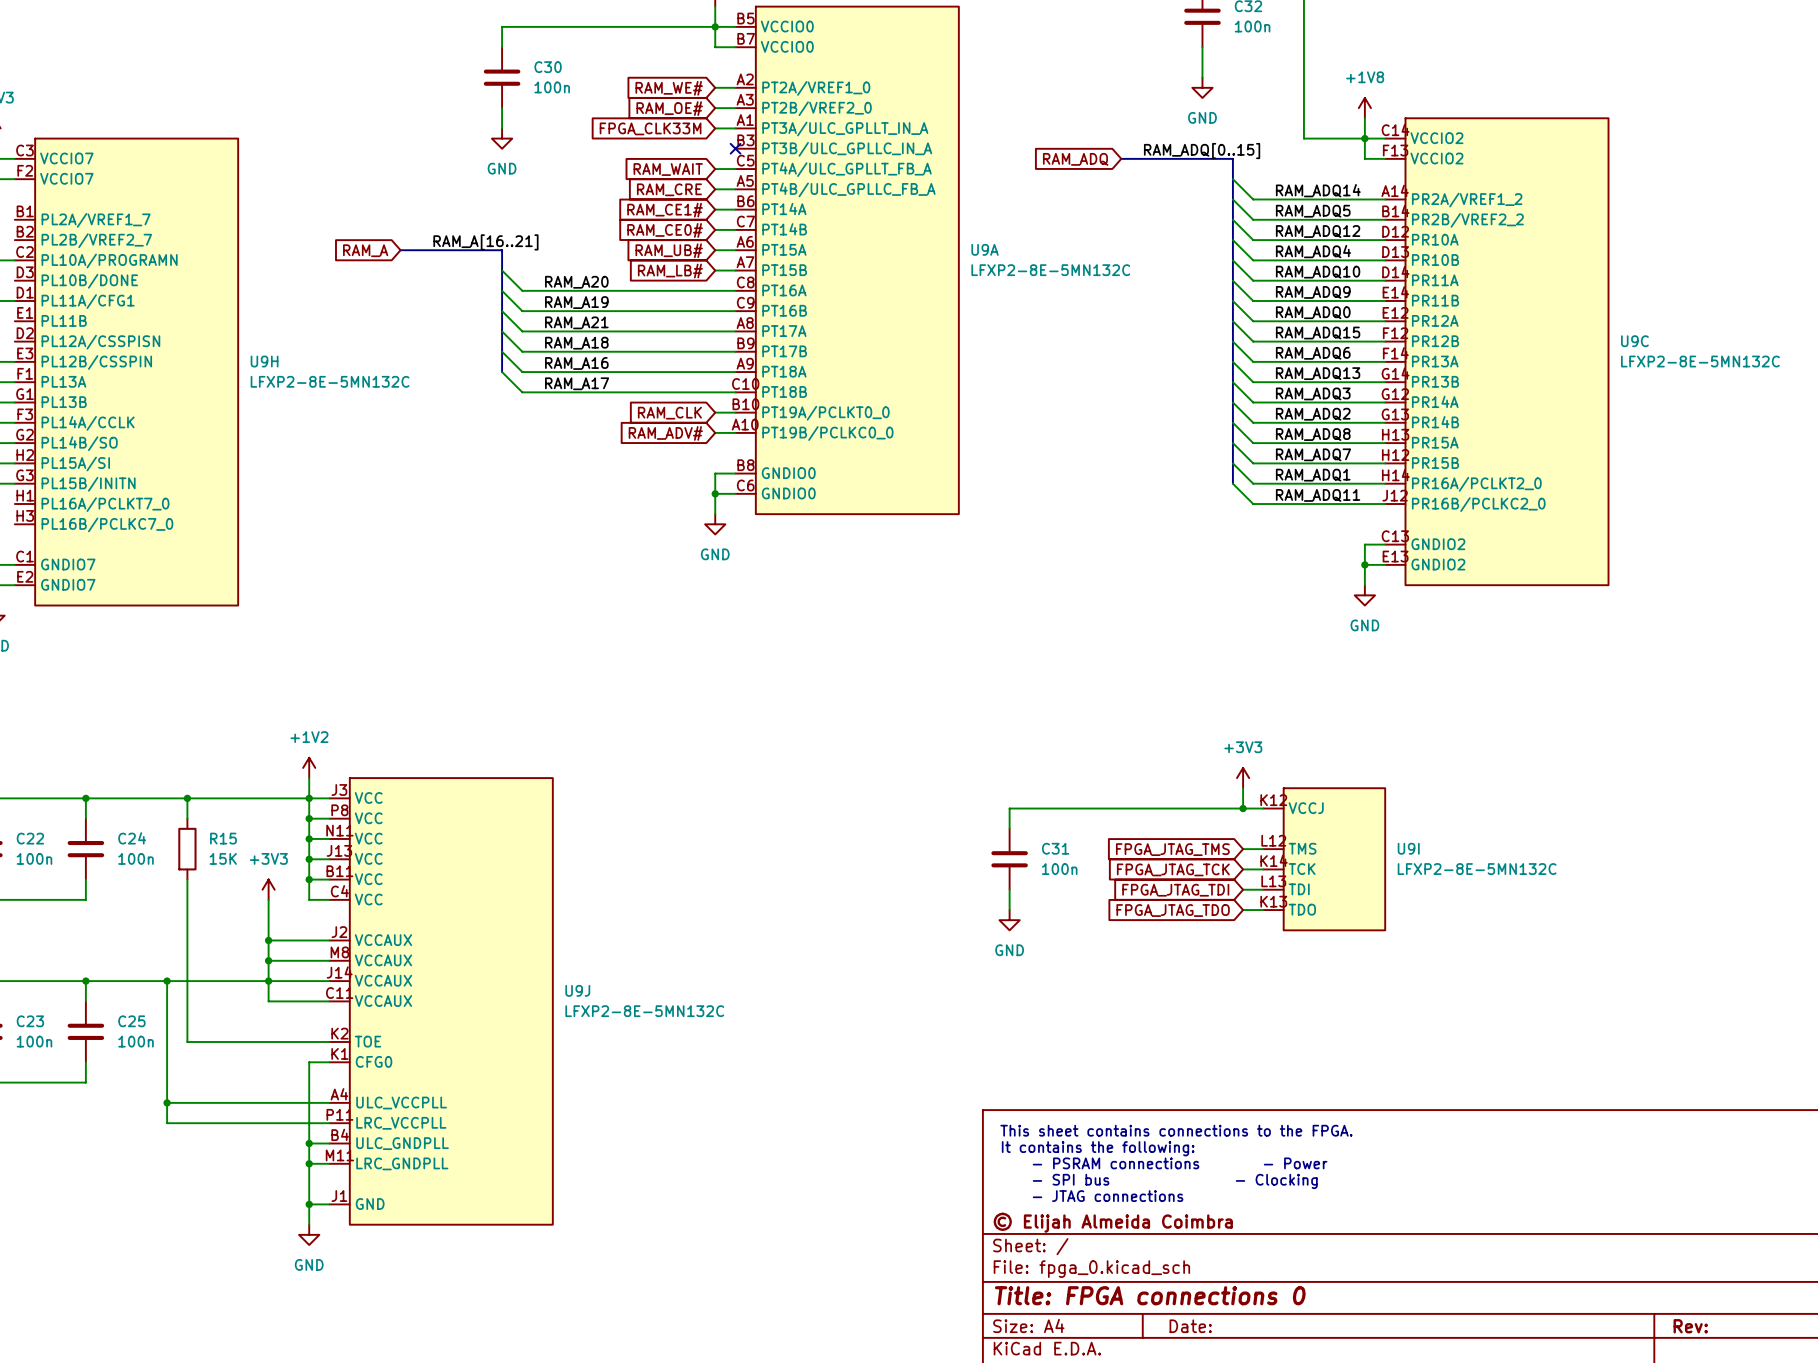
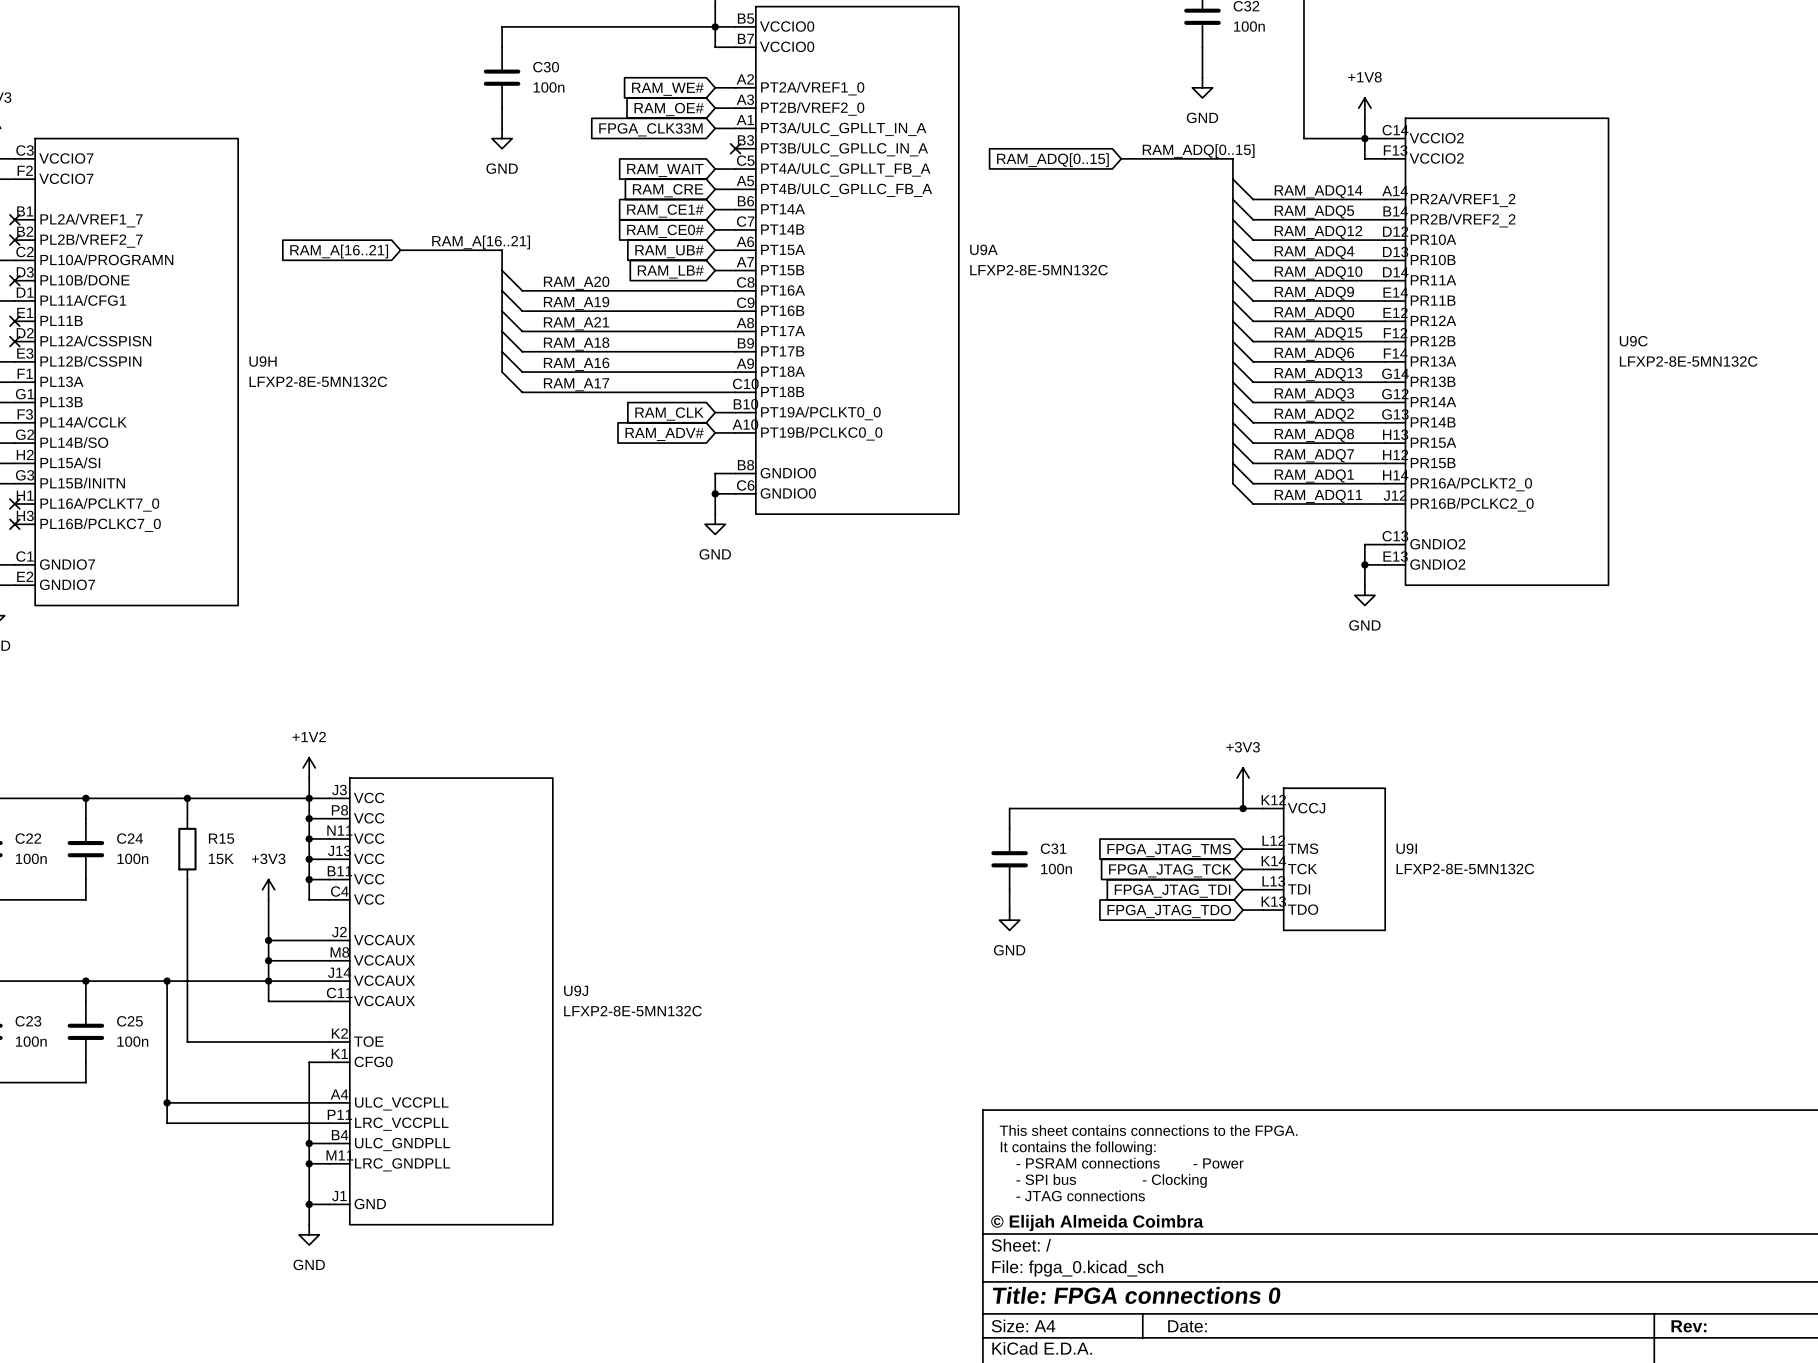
global label: RAM_ADQ (1075, 159) -> RAM_ADQ[0..15] (1052, 160)
no-connect mark: none -> (14, 219)
no-connect mark: none -> (14, 240)
global label: RAM_A (365, 250) -> RAM_A[16..21] (339, 251)
no-connect mark: none -> (14, 280)
no-connect mark: none -> (14, 321)
no-connect mark: none -> (14, 341)
no-connect mark: none -> (14, 504)
no-connect mark: none -> (14, 524)

